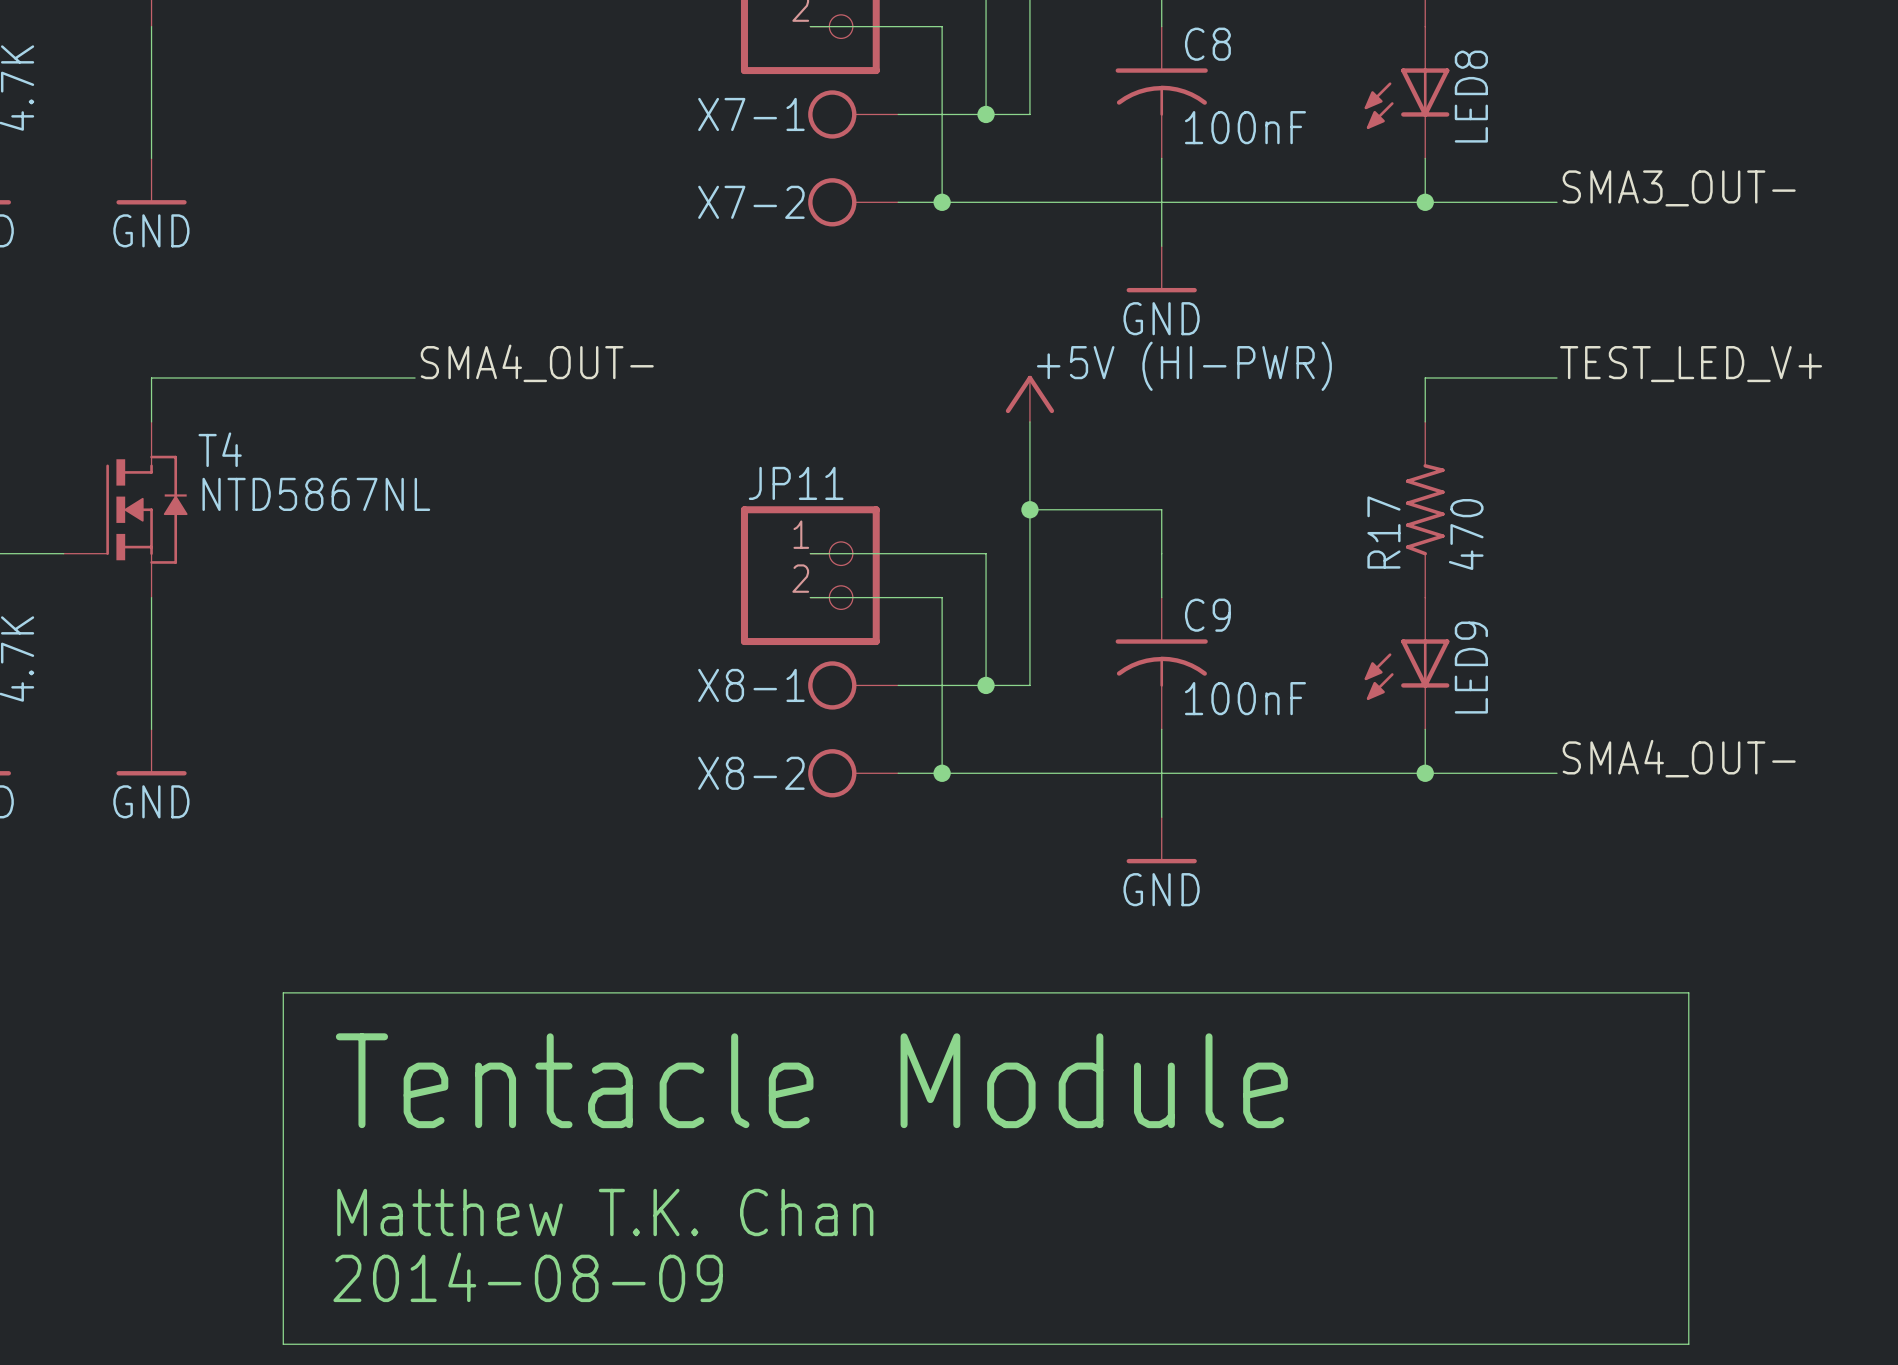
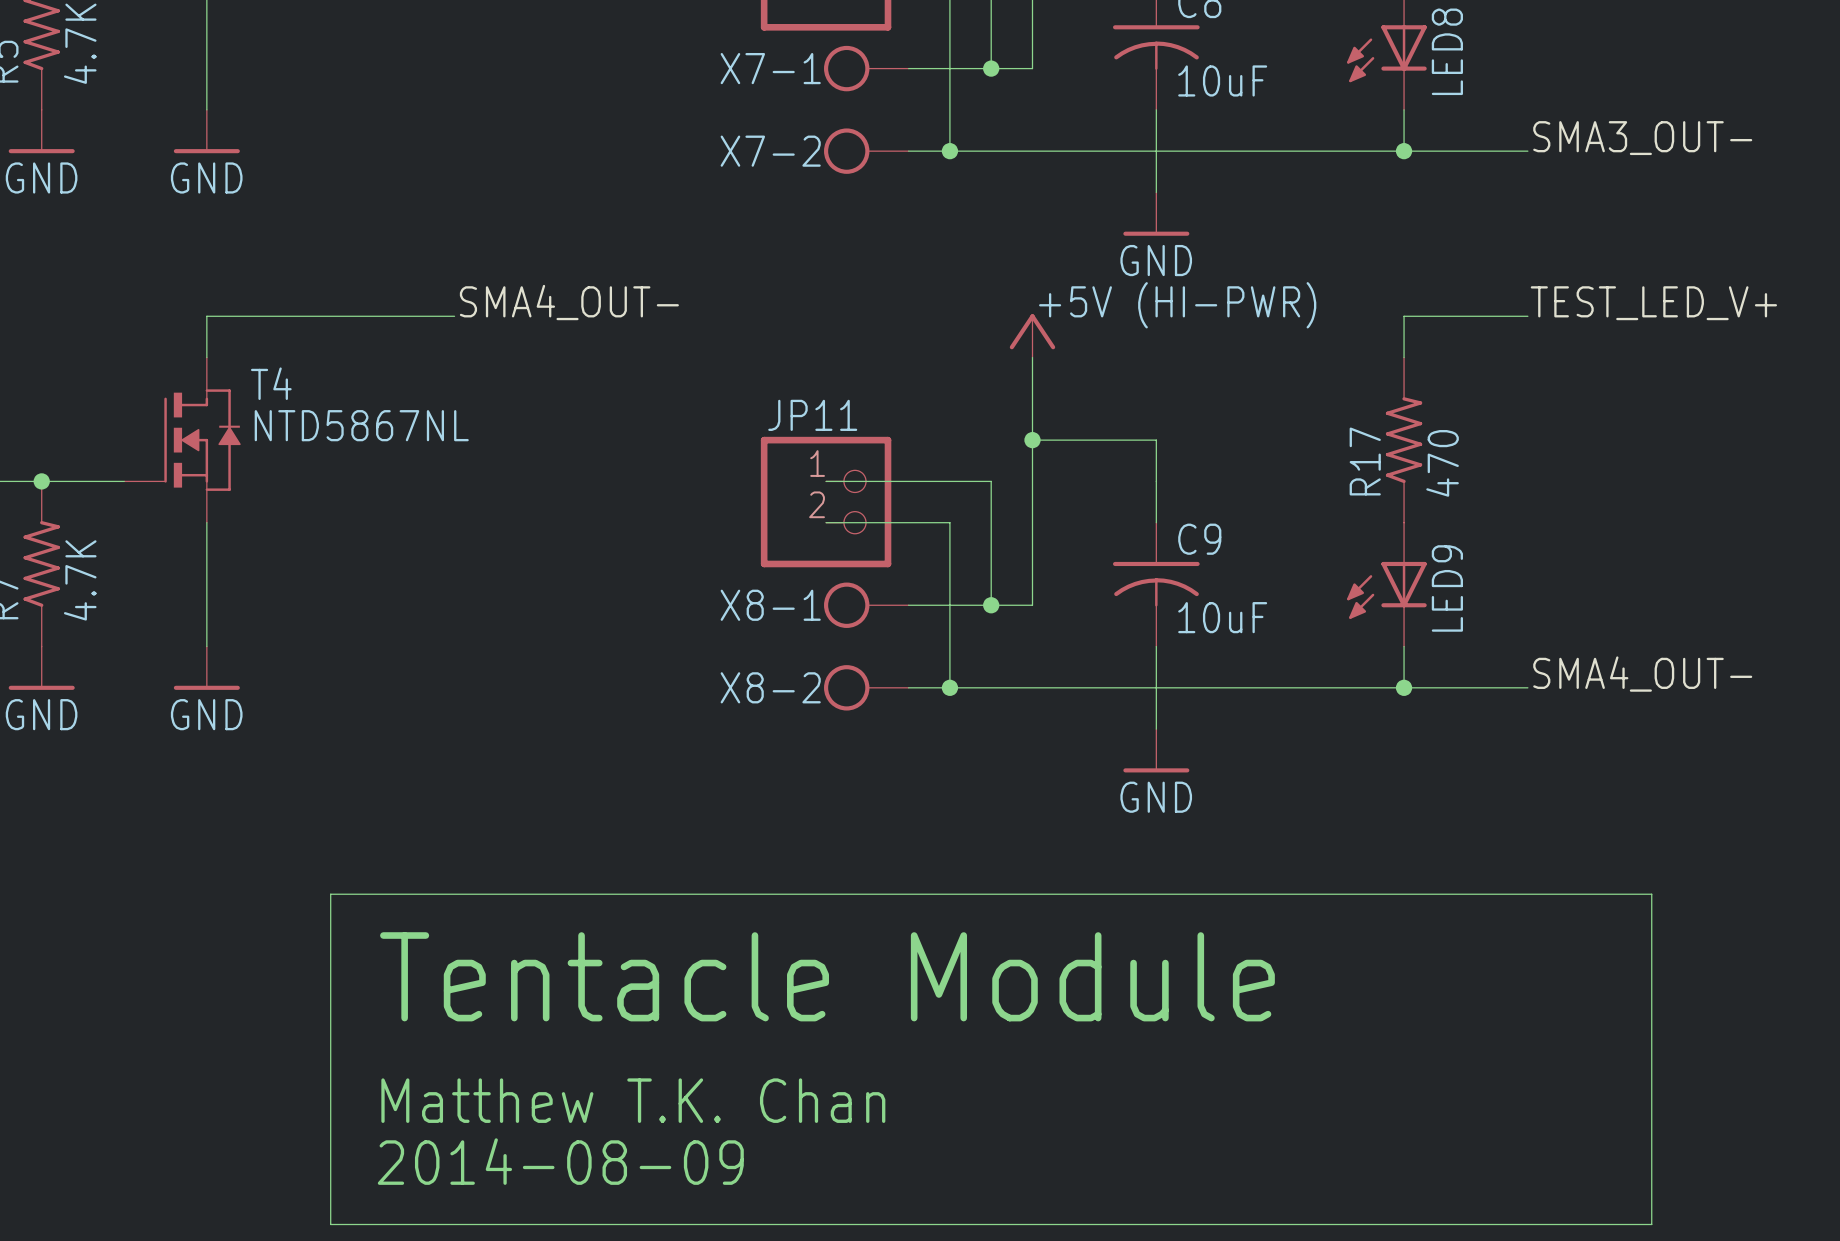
C8 value: 100nF (1245, 127) -> 10uF (1222, 80)
C9 value: 100nF (1245, 698) -> 10uF (1222, 617)

